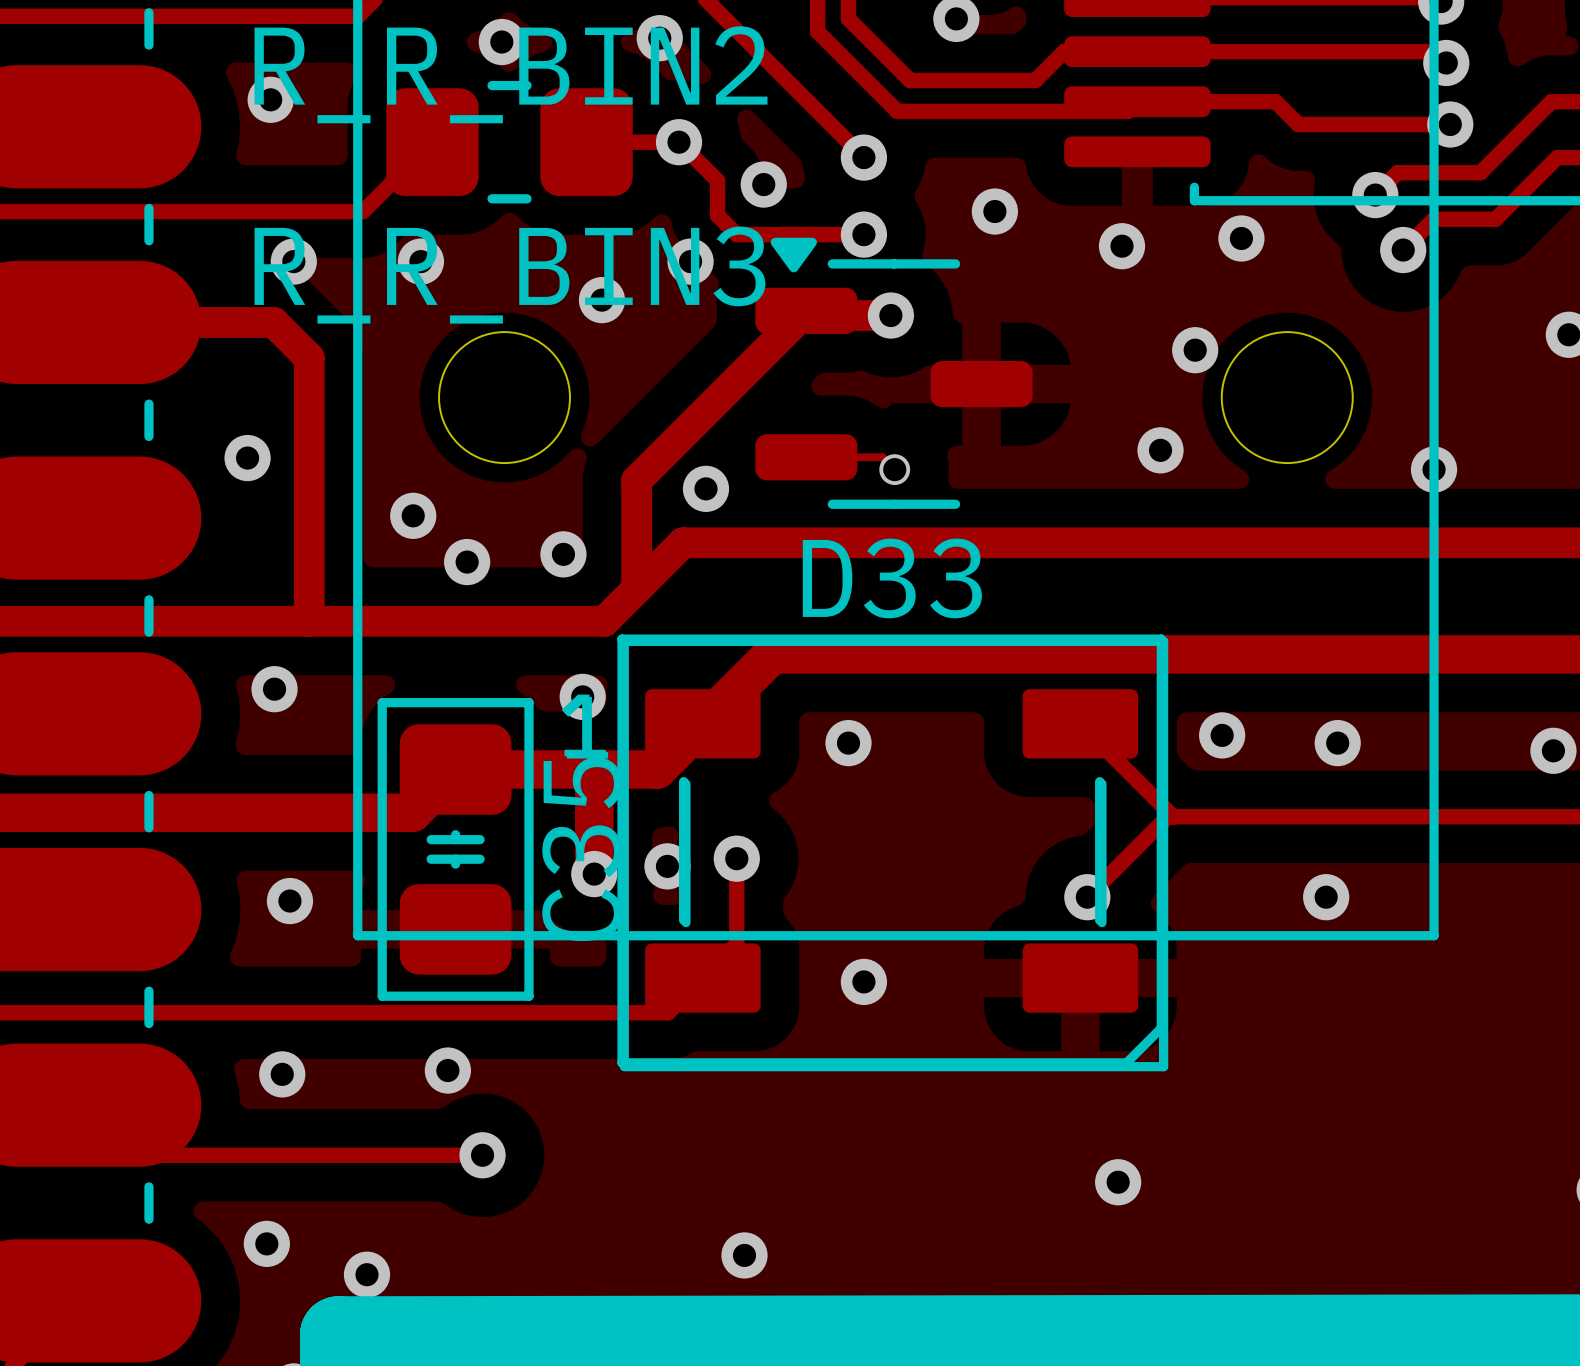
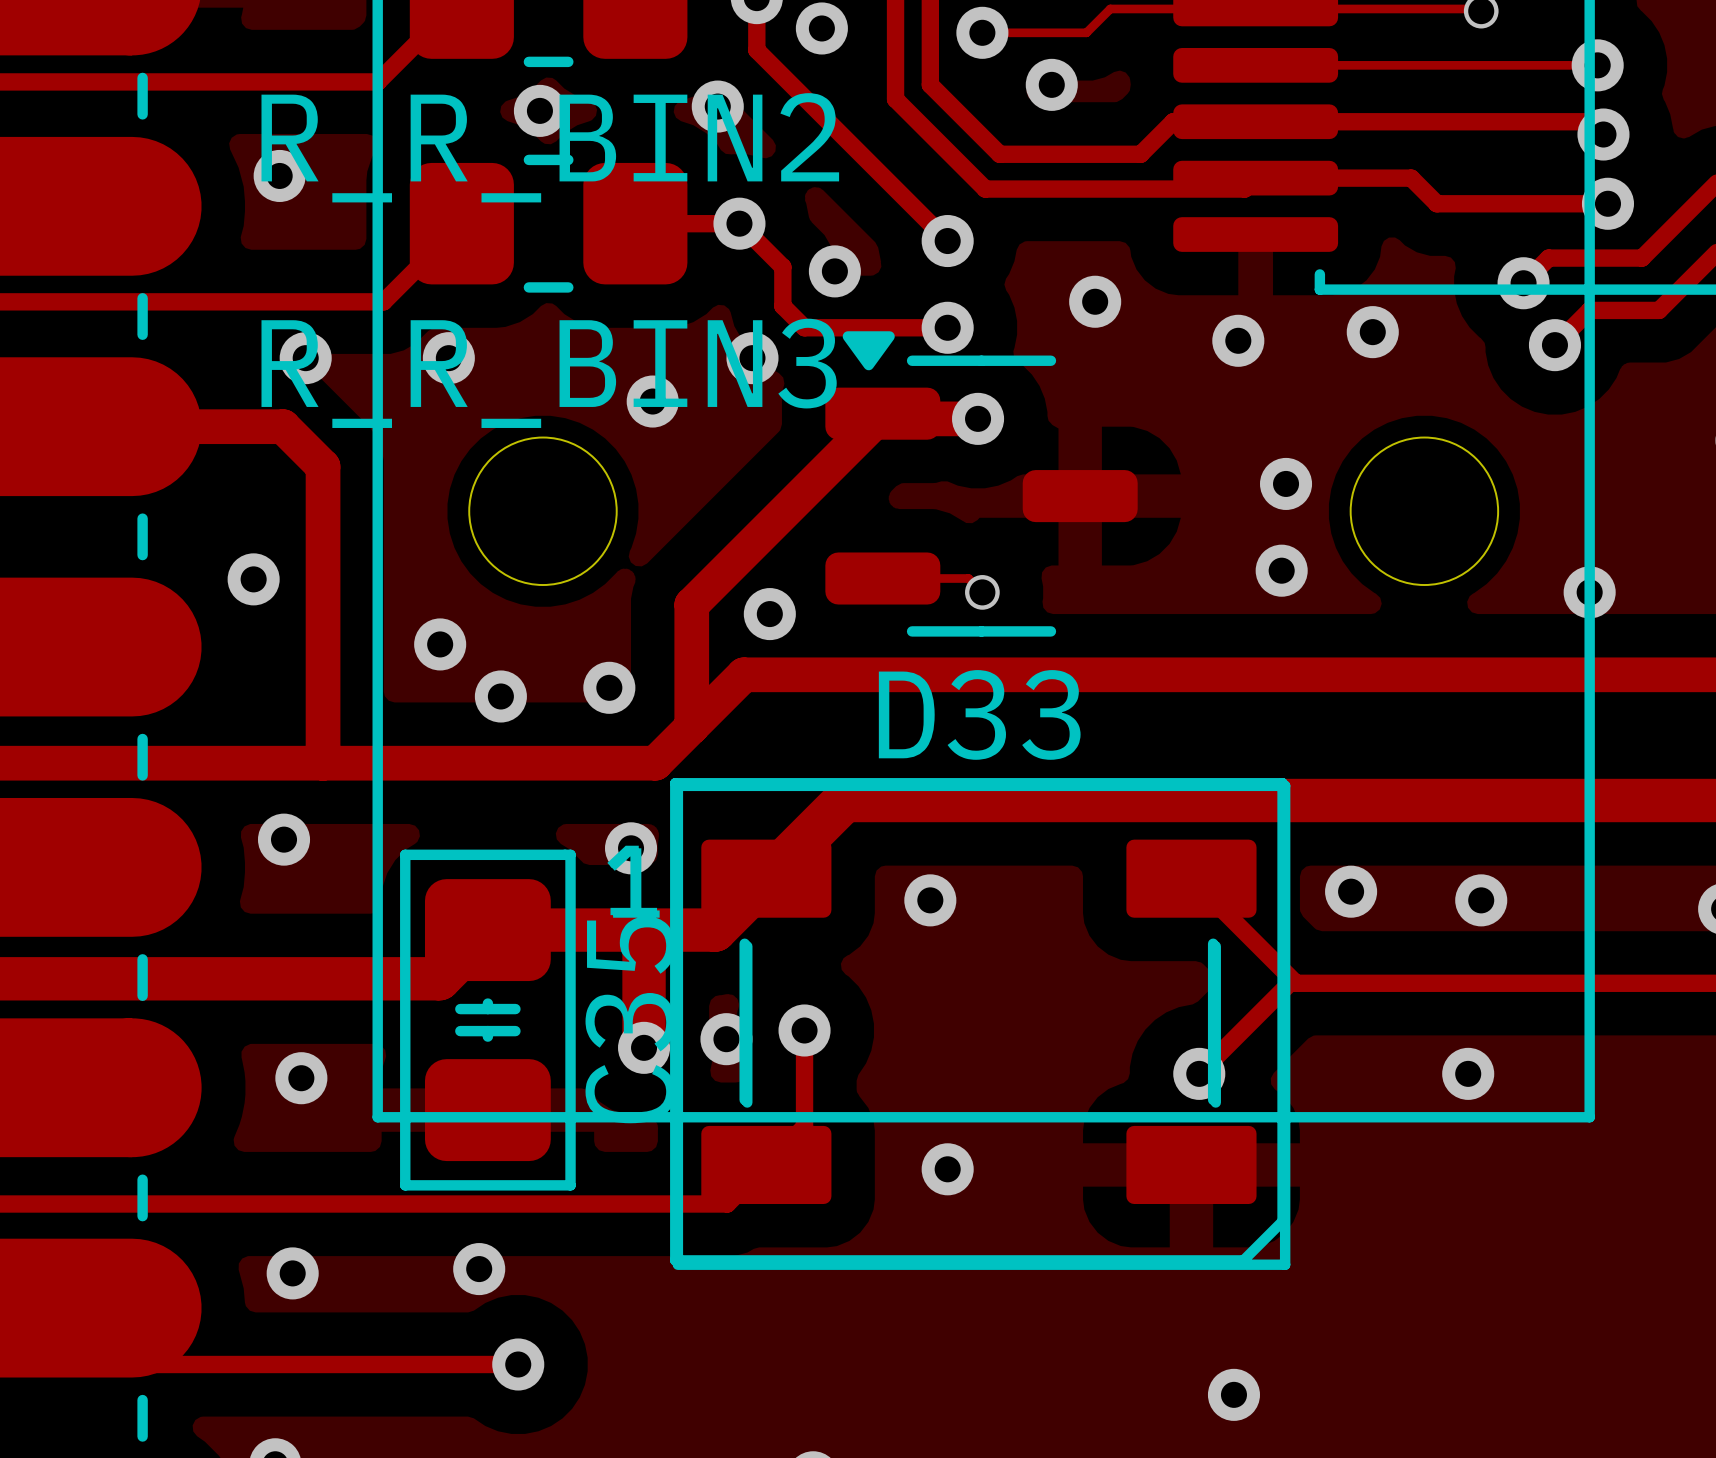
via position: (1195, 350) -> (1286, 483)

